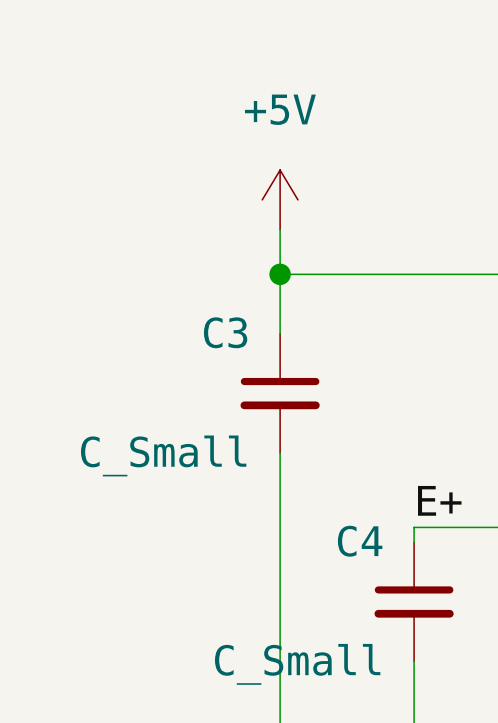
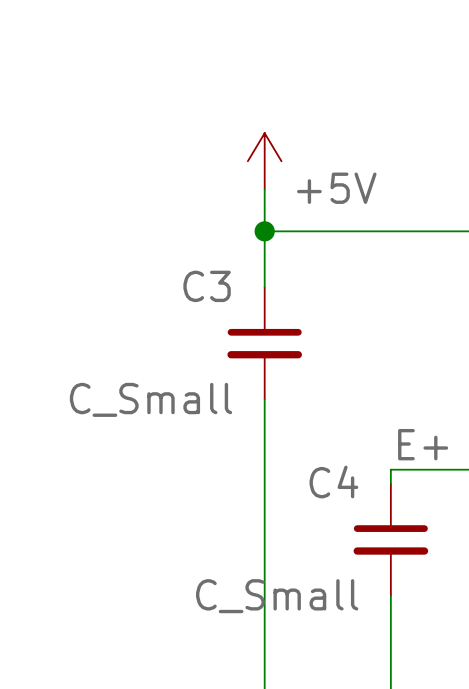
power symbol text position: +5V (280, 109) -> +5V (336, 188)

